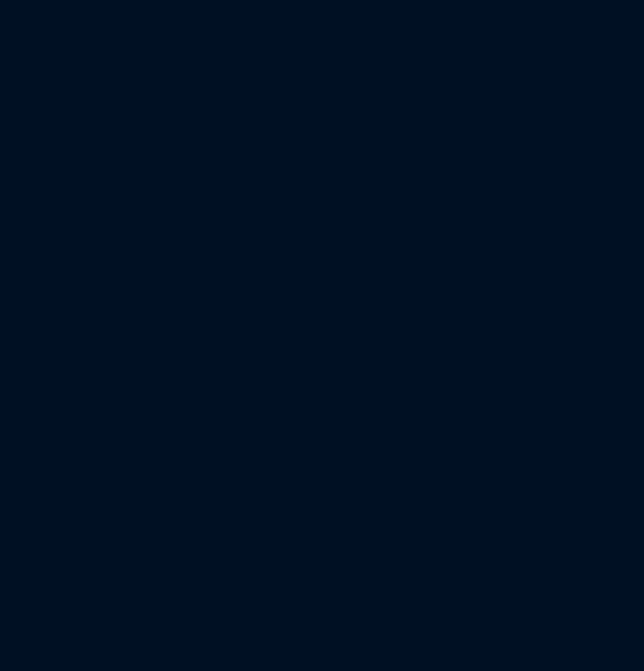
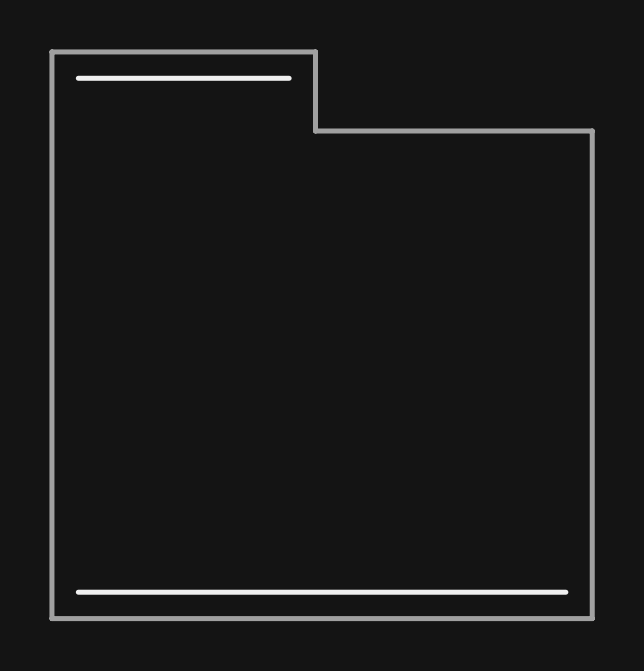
board edge: none -> (51, 51) (51, 618) (592, 618) (592, 131) (315, 131) (315, 51) (51, 51)
line: none -> (78, 78) (289, 78)
line: none -> (78, 592) (565, 592)

